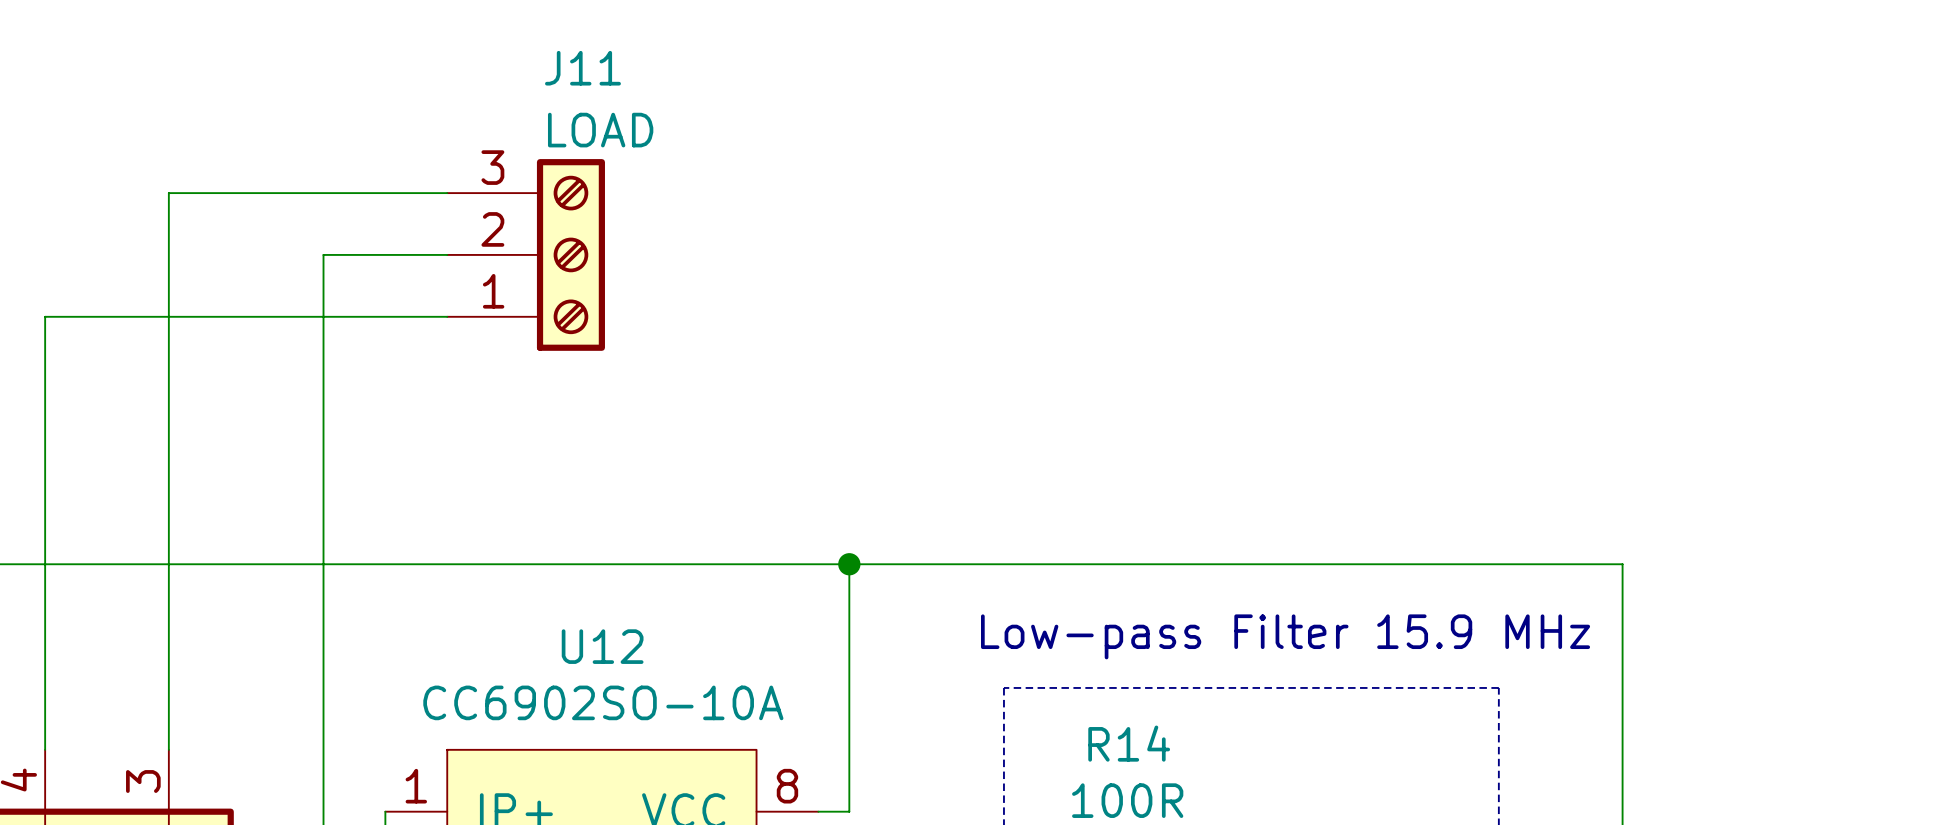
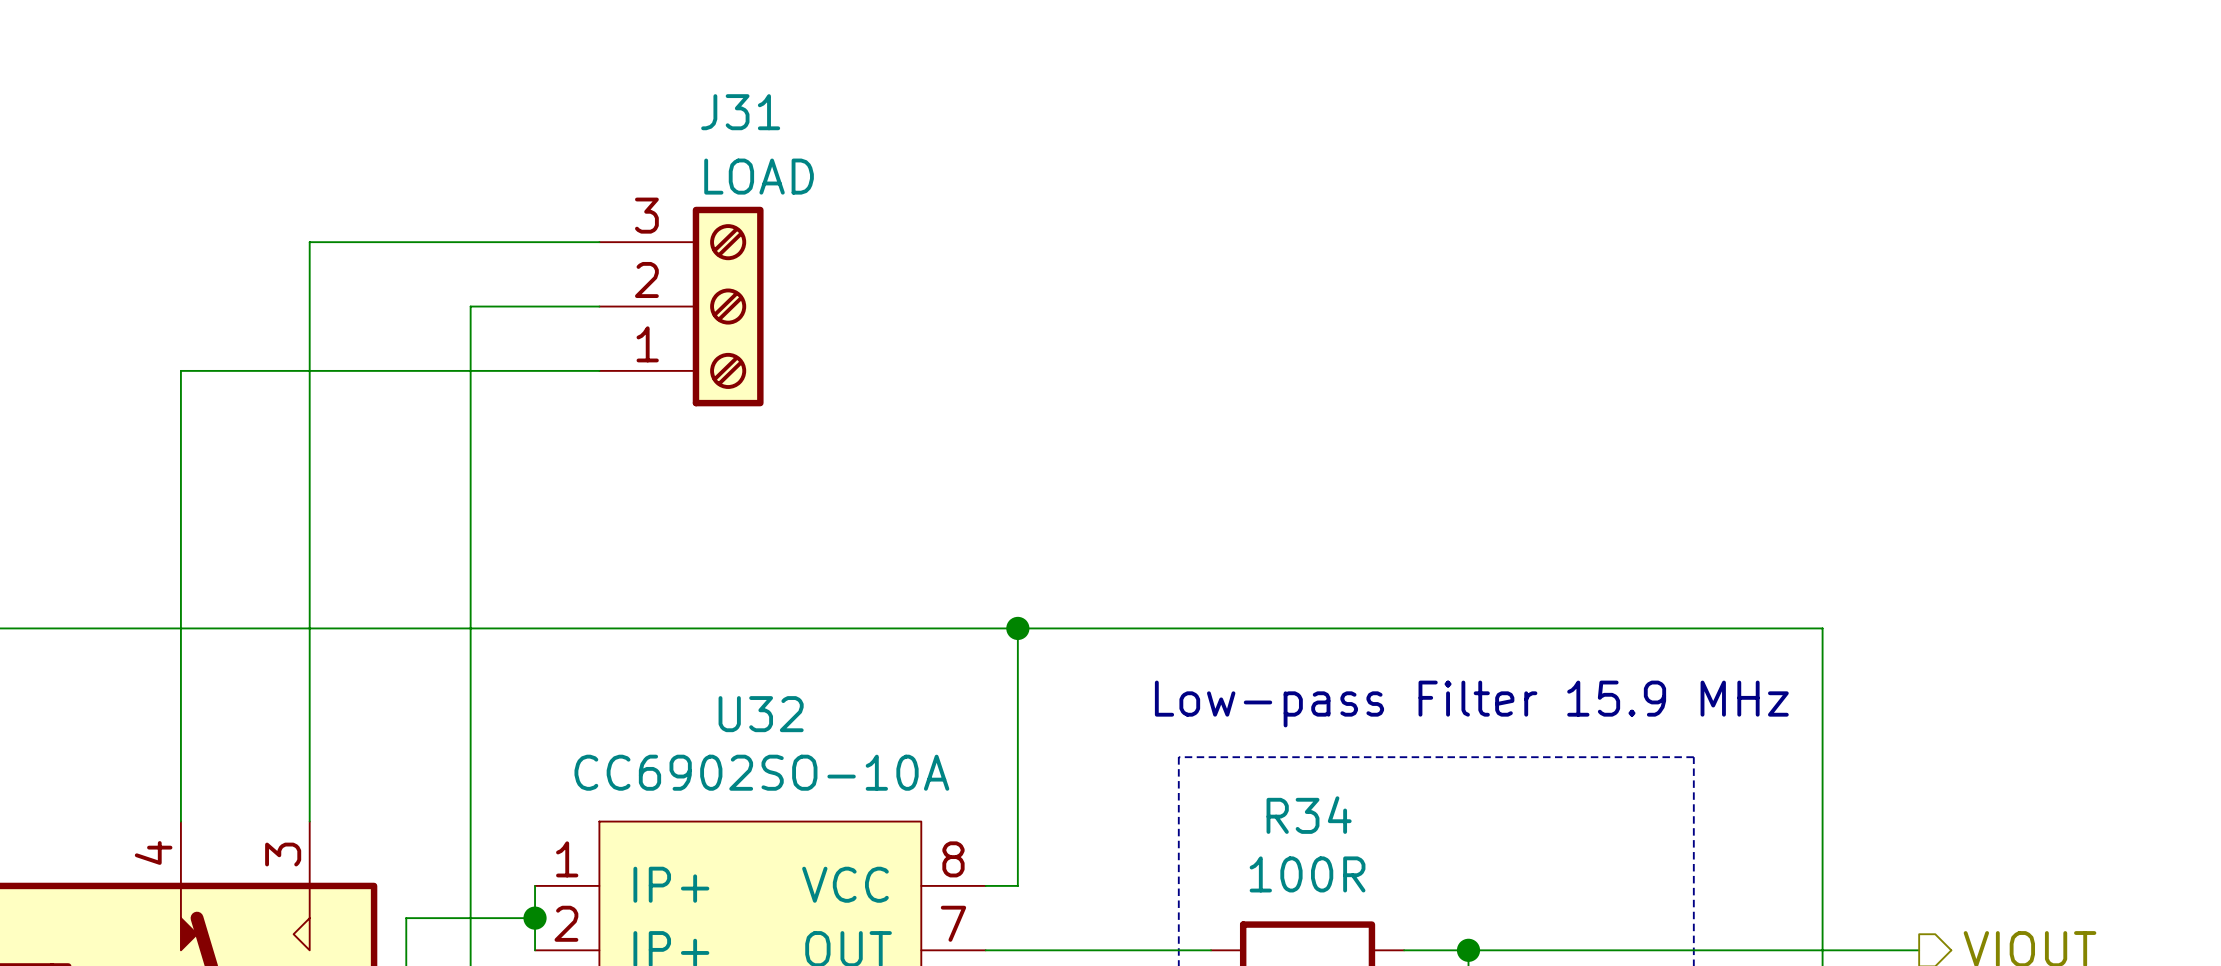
J11 name: J11 (582, 68) -> J31 (740, 112)
U12 name: U12 (602, 646) -> U32 (761, 714)
R14 name: R14 (1129, 743) -> R34 (1309, 815)

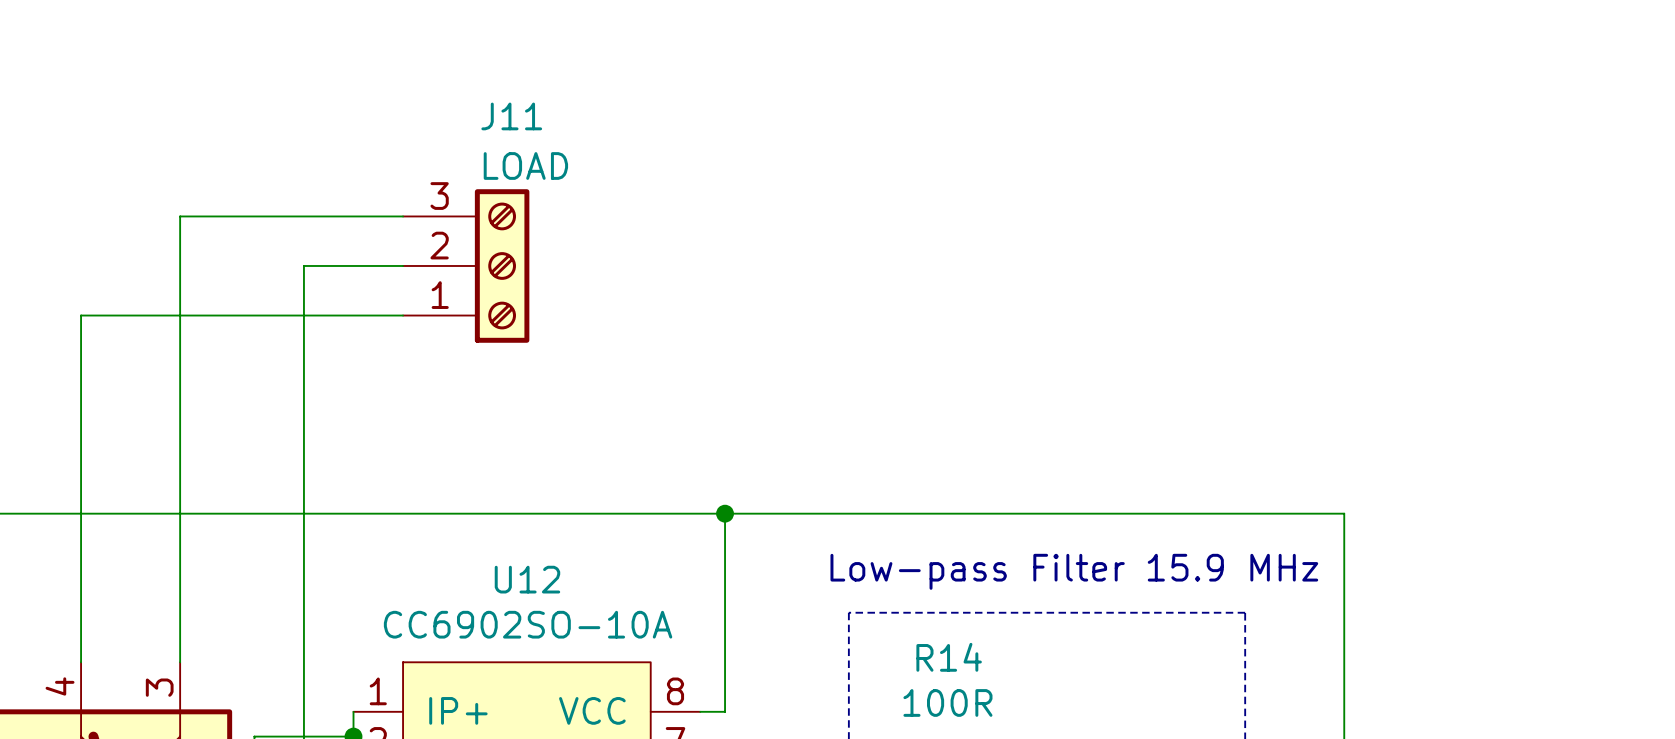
J31 name: J31 (740, 112) -> J11 (511, 116)
U32 name: U32 (761, 714) -> U12 (527, 579)
R34 name: R34 (1309, 815) -> R14 (949, 657)

